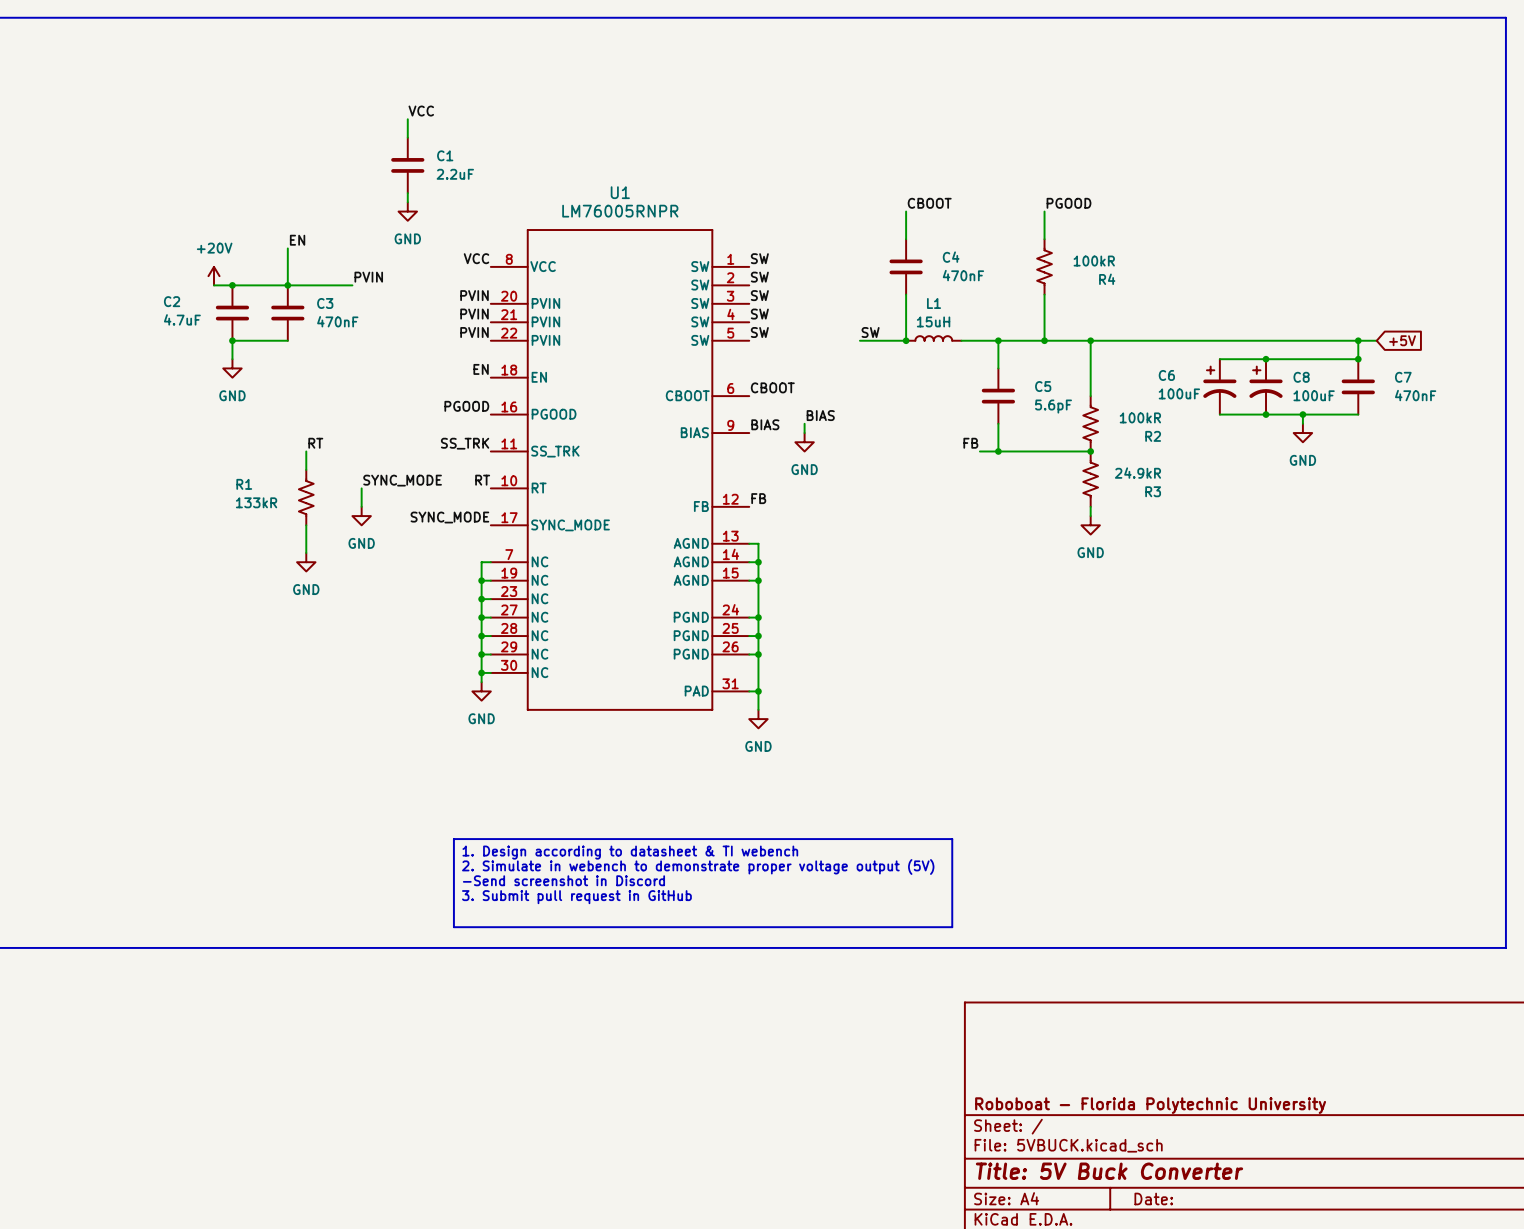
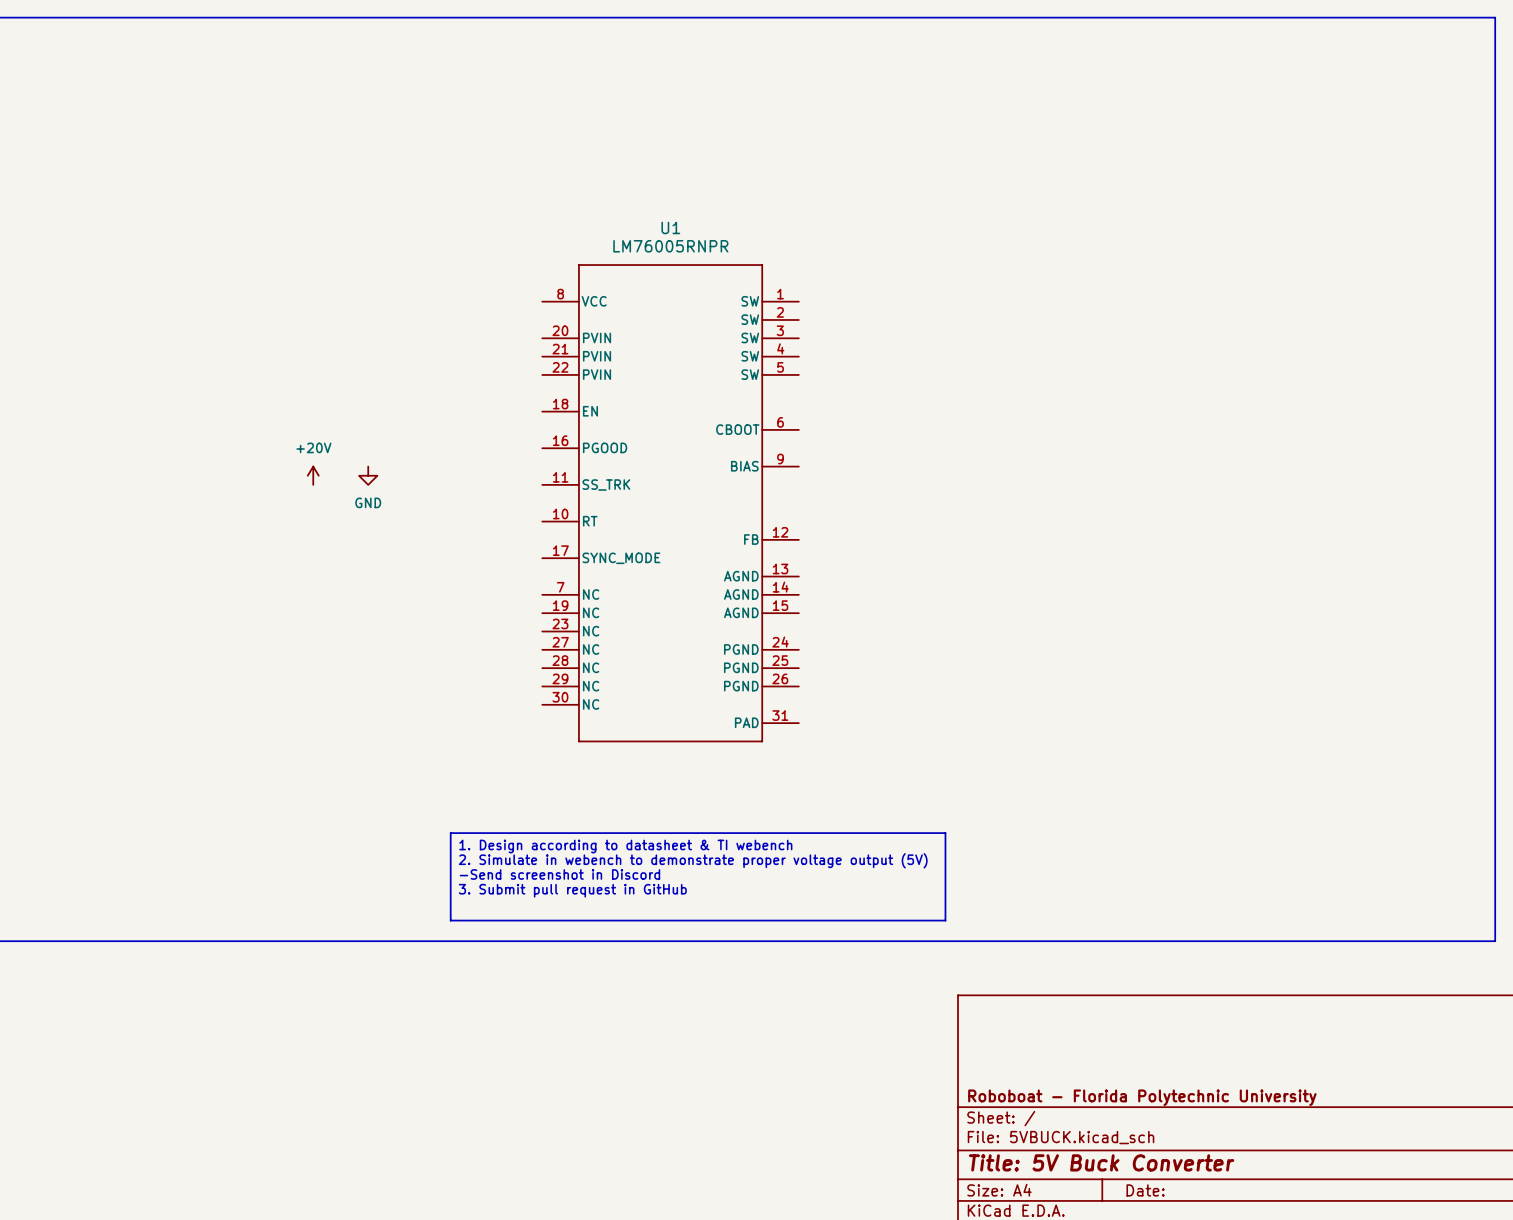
label: VCC (421, 111) -> none
wire: (407, 119) (407, 137) -> none
C1: 2.2uF (407, 165) -> none
wire: (407, 193) (407, 202) -> none
label: CBOOT (929, 203) -> none
label: PGOOD (1068, 203) -> none
power symbol: GND (407, 211) -> none
wire: (906, 211) (906, 239) -> none
wire: (1044, 211) (1044, 239) -> none
label: EN (297, 240) -> none
wire: (287, 248) (287, 285) -> none
label: VCC (476, 258) -> none
label: SW (759, 258) -> none
C4: 470nF (906, 266) -> none
R4: 100kR (1044, 266) -> none
power symbol: +20V (214, 276) -> none
label: PVIN (368, 277) -> none
label: SW (759, 277) -> none
wire: (214, 285) (352, 285) -> none
junction: (232, 285) -> none
junction: (287, 285) -> none
wire: (906, 294) (906, 340) (859, 340) -> none
wire: (1044, 294) (1044, 340) -> none
label: PVIN (474, 295) -> none
label: SW (759, 295) -> none
C2: 4.7uF (232, 313) -> none
C3: 470nF (287, 313) -> none
label: PVIN (474, 314) -> none
label: SW (759, 314) -> none
label: PVIN (474, 332) -> none
label: SW (759, 332) -> none
label: SW (870, 332) -> none
L1: 15uH (933, 338) -> none
junction: (232, 340) -> none
wire: (287, 340) (232, 340) (232, 359) -> none
junction: (906, 340) -> none
wire: (961, 340) (1376, 340) -> none
wire: (998, 340) (998, 368) -> none
junction: (998, 340) -> none
junction: (1044, 340) -> none
wire: (1090, 340) (1090, 396) -> none
junction: (1090, 340) -> none
wire: (1358, 340) (1358, 359) (1219, 359) -> none
junction: (1358, 340) -> none
global label: +5V (1402, 340) -> none
junction: (1266, 359) -> none
junction: (1358, 359) -> none
power symbol: GND (232, 368) -> none
label: EN (481, 369) -> none
C6: 100uF (1219, 386) -> none
C8: 100uF (1266, 386) -> none
C7: 470nF (1358, 386) -> none
label: CBOOT (772, 387) -> none
C5: 5.6pF (998, 396) -> none
label: PGOOD (466, 406) -> none
wire: (1219, 414) (1358, 414) -> none
junction: (1266, 414) -> none
wire: (1302, 414) (1302, 423) -> none
junction: (1302, 414) -> none
label: BIAS (820, 415) -> none
wire: (804, 423) (804, 433) -> none
wire: (998, 423) (998, 451) -> none
R2: 100kR (1090, 423) -> none
label: BIAS (765, 424) -> none
power symbol: GND (1302, 433) -> none
power symbol: GND (804, 442) -> none
label: RT (315, 443) -> none
label: SS_TRK (465, 443) -> none
label: FB (970, 443) -> none
wire: (306, 451) (306, 469) -> none
wire: (979, 451) (1090, 451) -> none
junction: (998, 451) -> none
junction: (1090, 451) -> none
U1 position: (620, 469) -> (670, 503)
power symbol: none -> +20V (313, 475)
R3: 24.9kR (1090, 479) -> none
label: SYNC_MODE (402, 480) -> none
label: RT (482, 480) -> none
wire: (361, 488) (361, 506) -> none
R1: 133kR (306, 497) -> none
label: FB (758, 498) -> none
wire: (1090, 506) (1090, 516) -> none
power symbol position: GND (361, 516) -> GND (368, 475)
label: SYNC_MODE (449, 517) -> none
wire: (306, 525) (306, 552) -> none
power symbol: GND (1090, 525) -> none
wire: (749, 543) (758, 543) (758, 709) -> none
power symbol: GND (306, 562) -> none
wire: (490, 562) (481, 562) (481, 682) -> none
wire: (749, 562) (758, 562) -> none
junction: (758, 562) -> none
wire: (481, 580) (490, 580) -> none
junction: (481, 580) -> none
junction: (758, 580) -> none
wire: (481, 599) (490, 599) -> none
junction: (481, 599) -> none
wire: (481, 617) (490, 617) -> none
junction: (481, 617) -> none
junction: (758, 617) -> none
wire: (481, 636) (490, 636) -> none
junction: (481, 636) -> none
wire: (749, 636) (758, 636) -> none
junction: (758, 636) -> none
wire: (481, 654) (490, 654) -> none
junction: (481, 654) -> none
junction: (758, 654) -> none
wire: (481, 672) (490, 672) -> none
junction: (481, 672) -> none
power symbol: GND (481, 691) -> none
junction: (758, 691) -> none
power symbol: GND (758, 719) -> none

